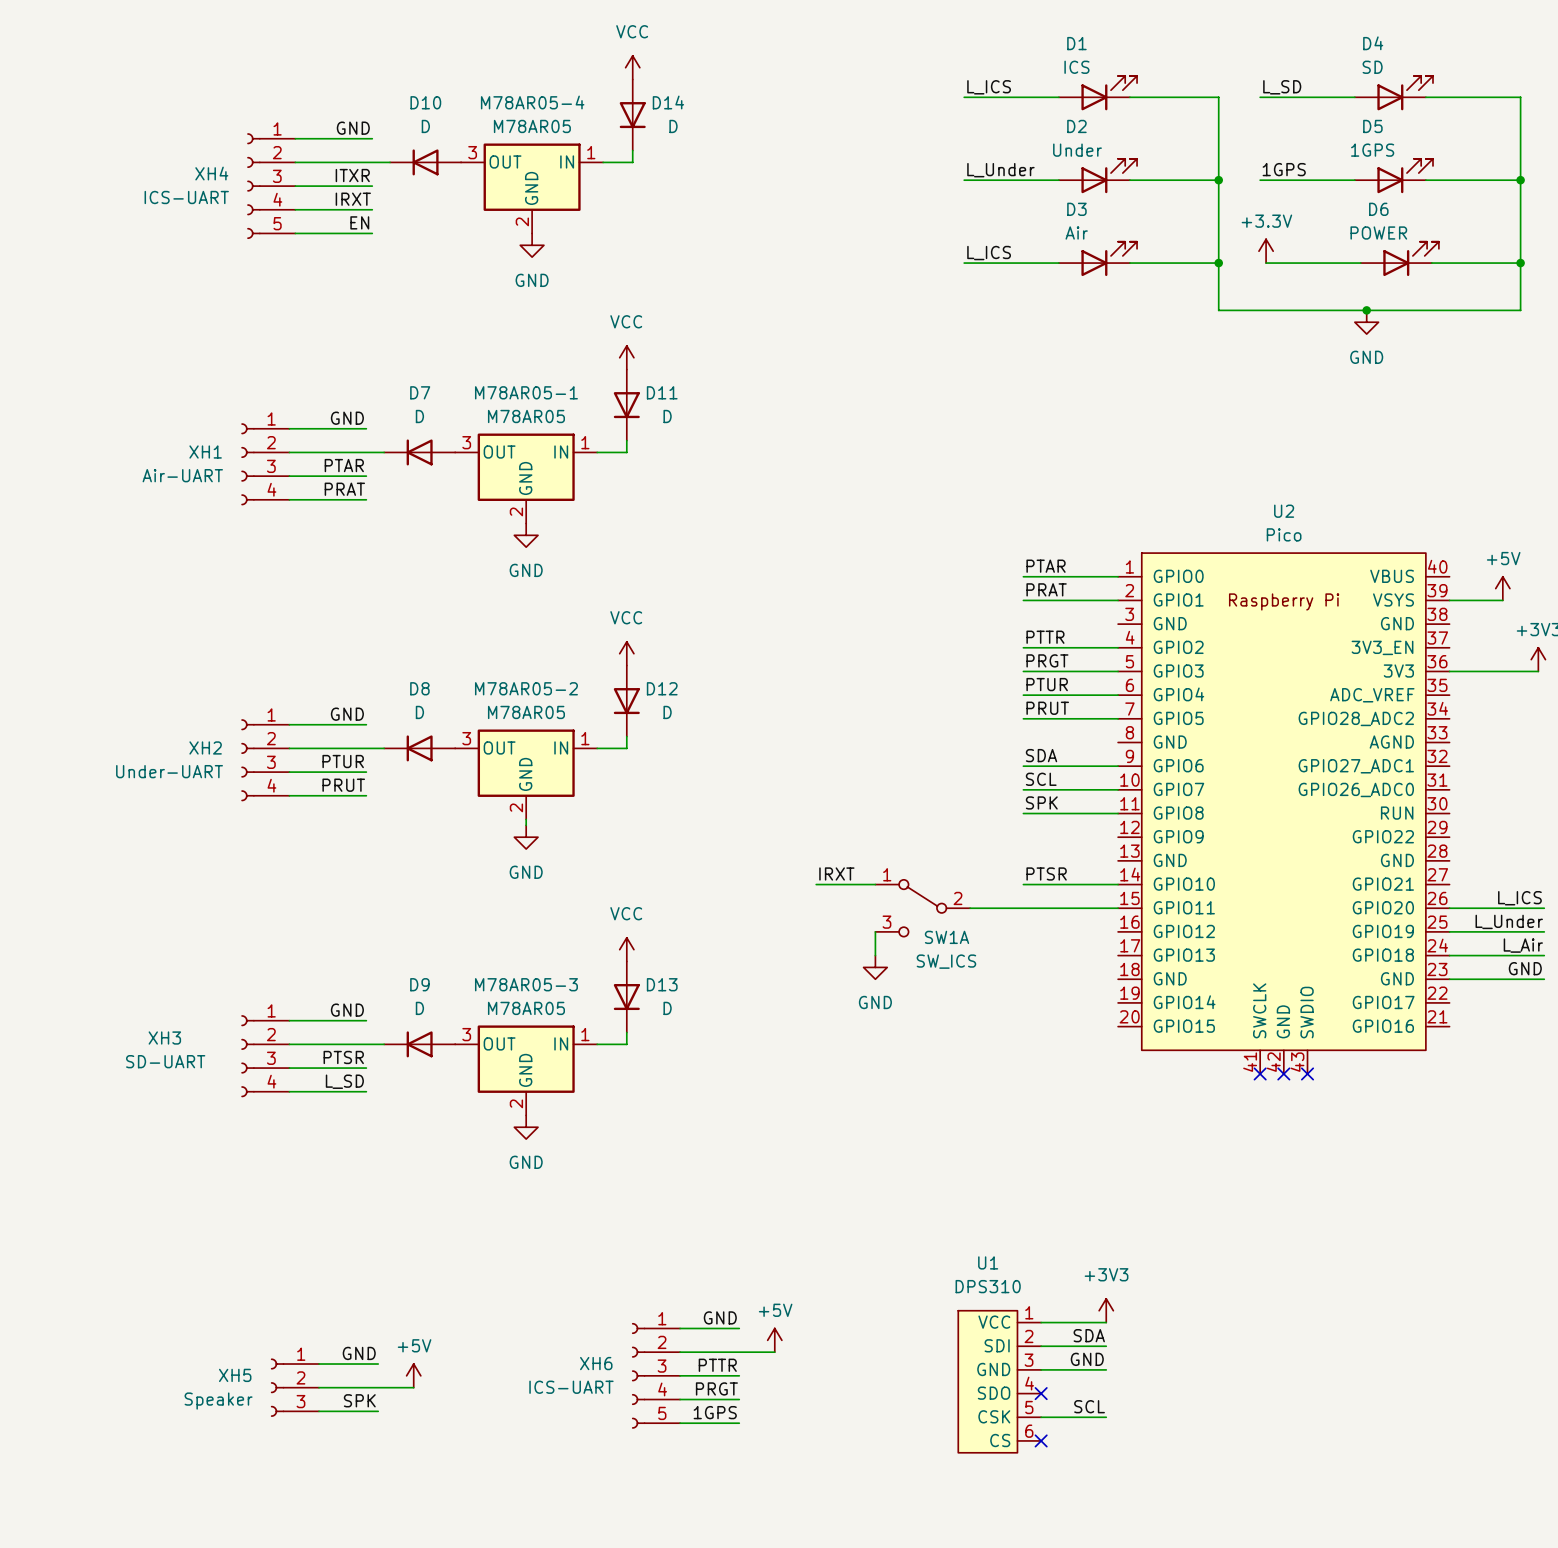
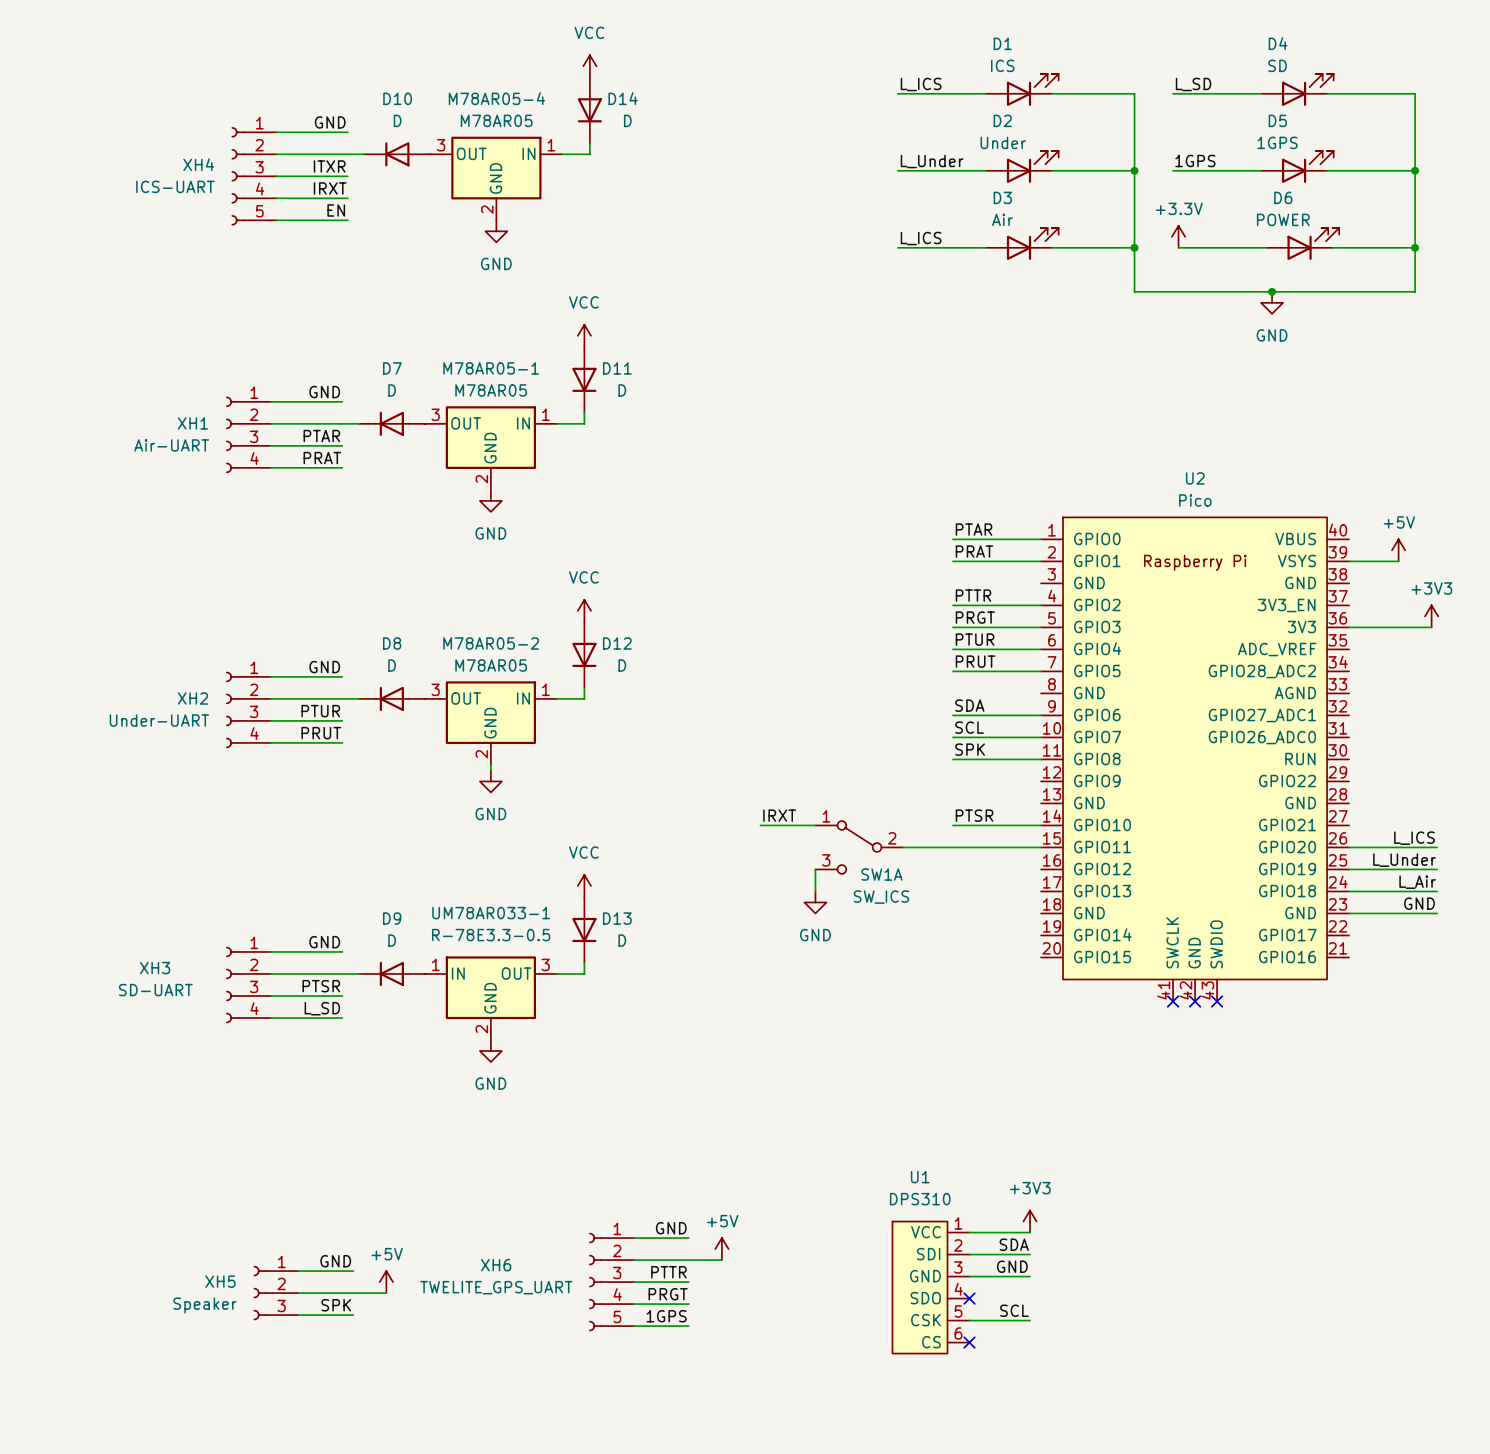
M78AR05-3 name: M78AR05-3 (526, 984) -> UM78AR033-1 (491, 913)
M78AR05-3 value: M78AR05 (526, 1008) -> R-78E3.3-0.5 (491, 935)
M78AR05-3 flip: as is (526, 1059) -> left-right (490, 987)
XH6 name position: XH6 (596, 1363) -> XH6 (496, 1265)
XH6 value: ICS-UART (571, 1387) -> TWELITE_GPS_UART (496, 1287)

